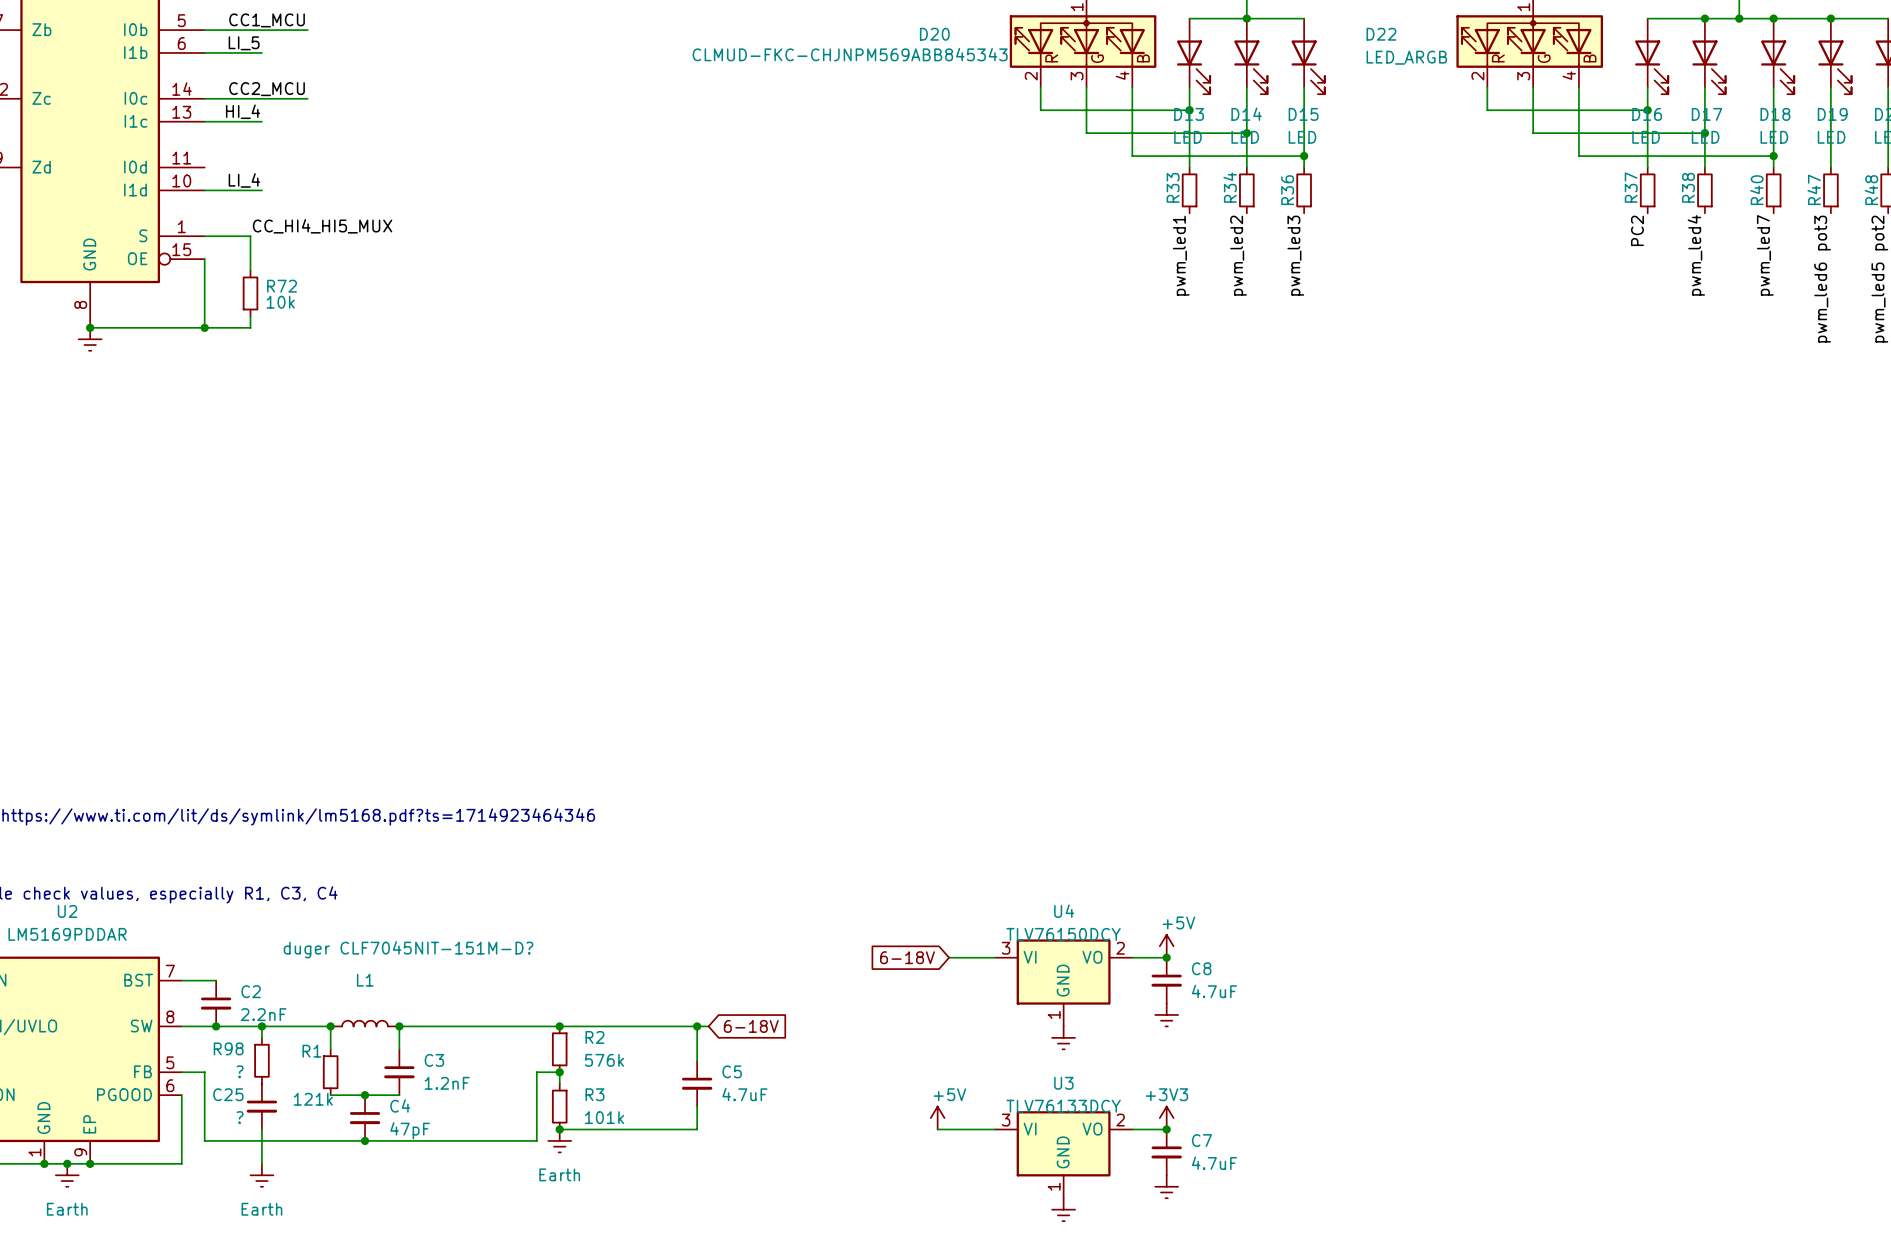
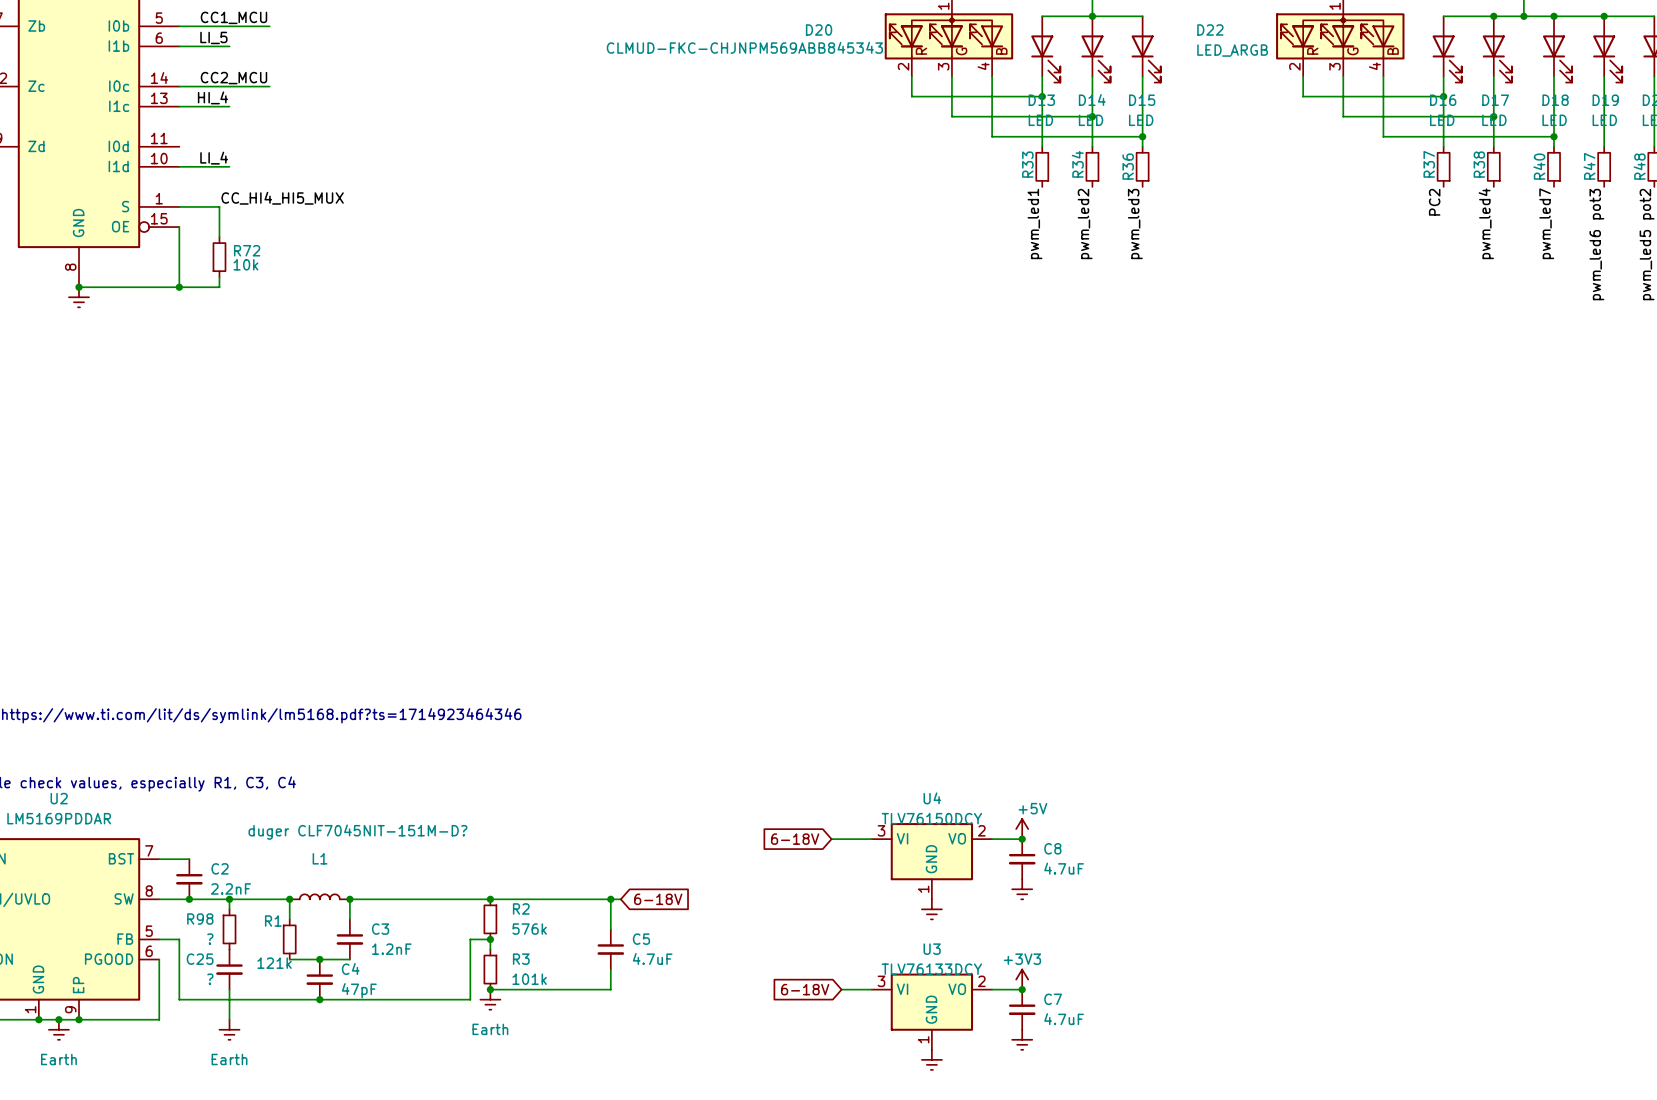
power symbol: +5V (937, 1118) -> none
global label: none -> 6-18V (805, 989)
wire: (937, 1129) (960, 1129) -> none

